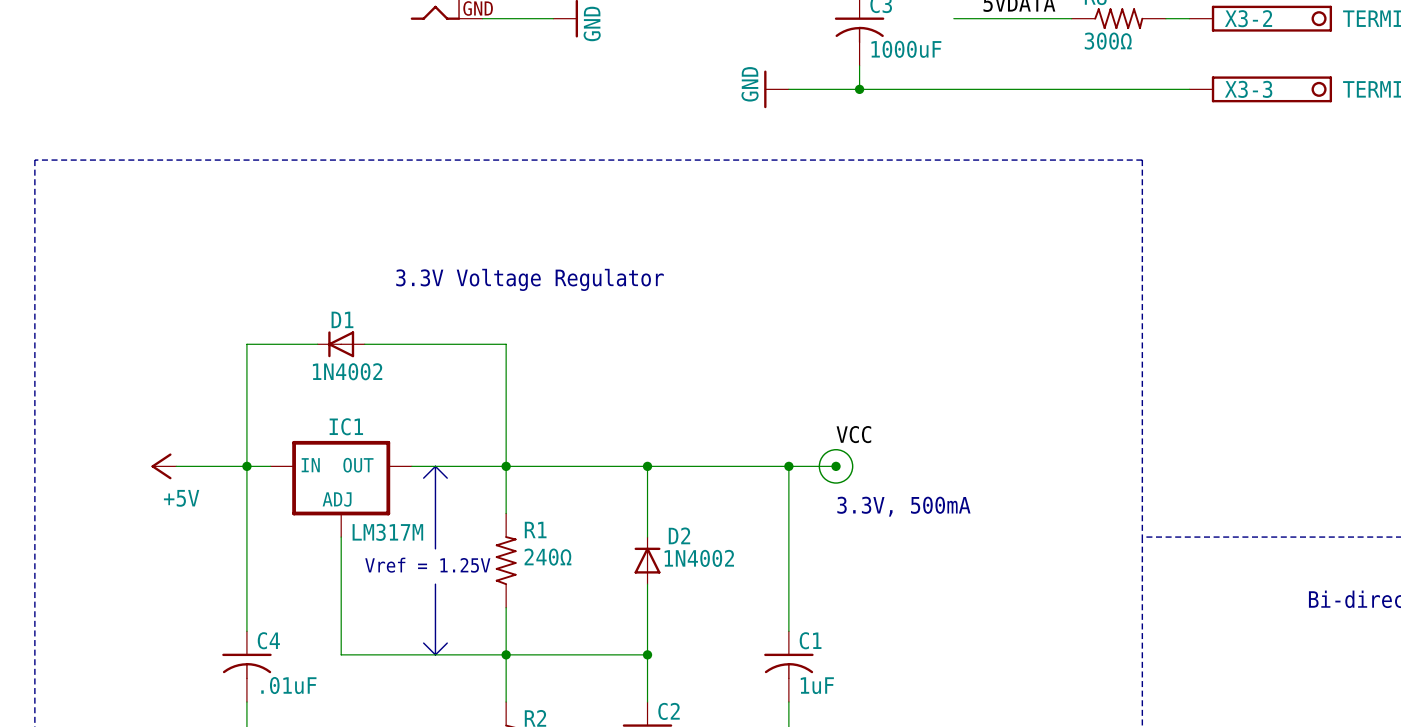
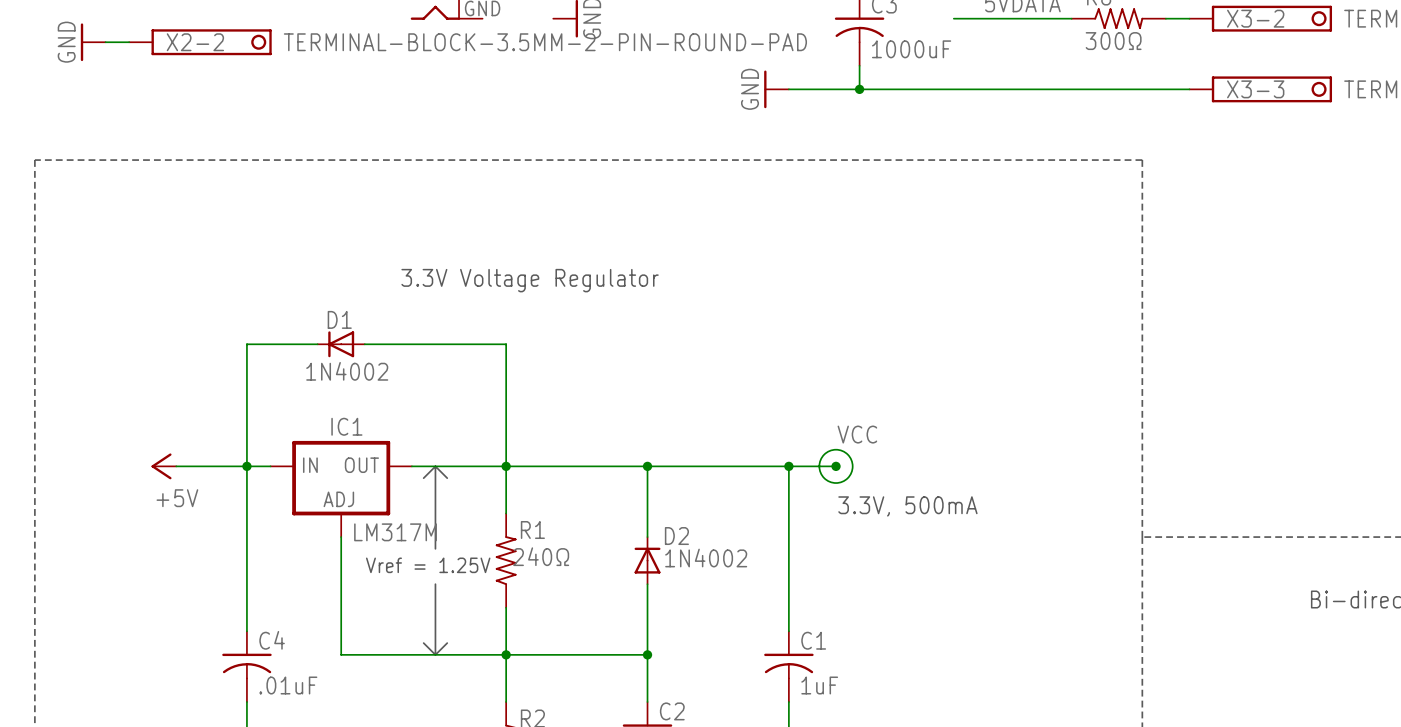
wire: (482, 18) (553, 18) -> none
power symbol: none -> GND (93, 42)
wire: none -> (105, 42) (129, 42)
X2-2: none -> TERMINAL-BLOCK-3.5MM-2-PIN-ROUND-PAD (200, 42)

